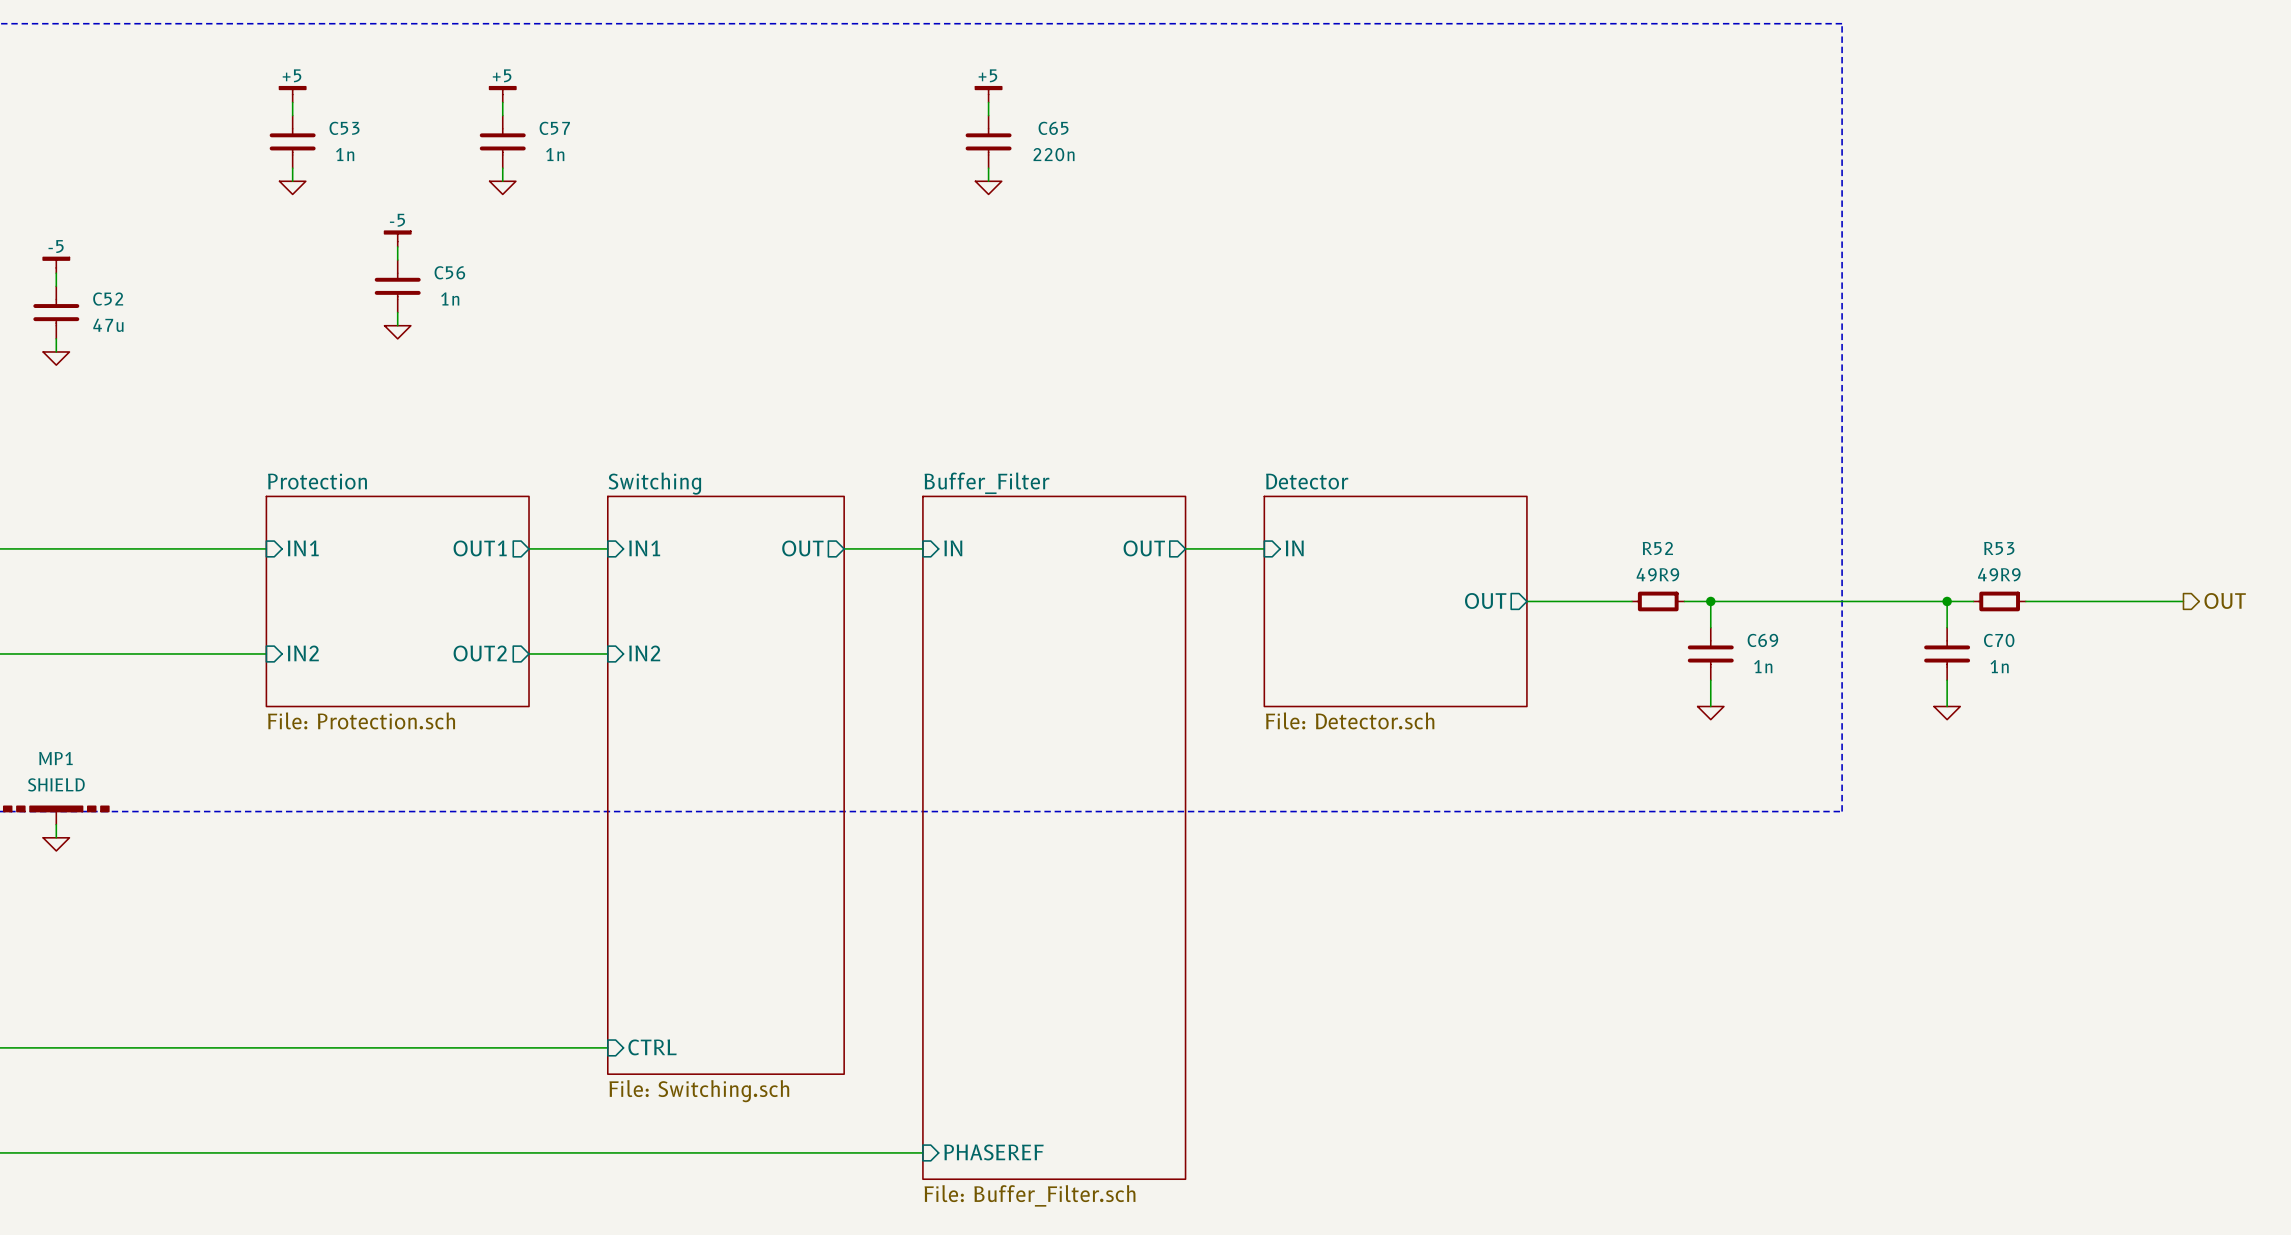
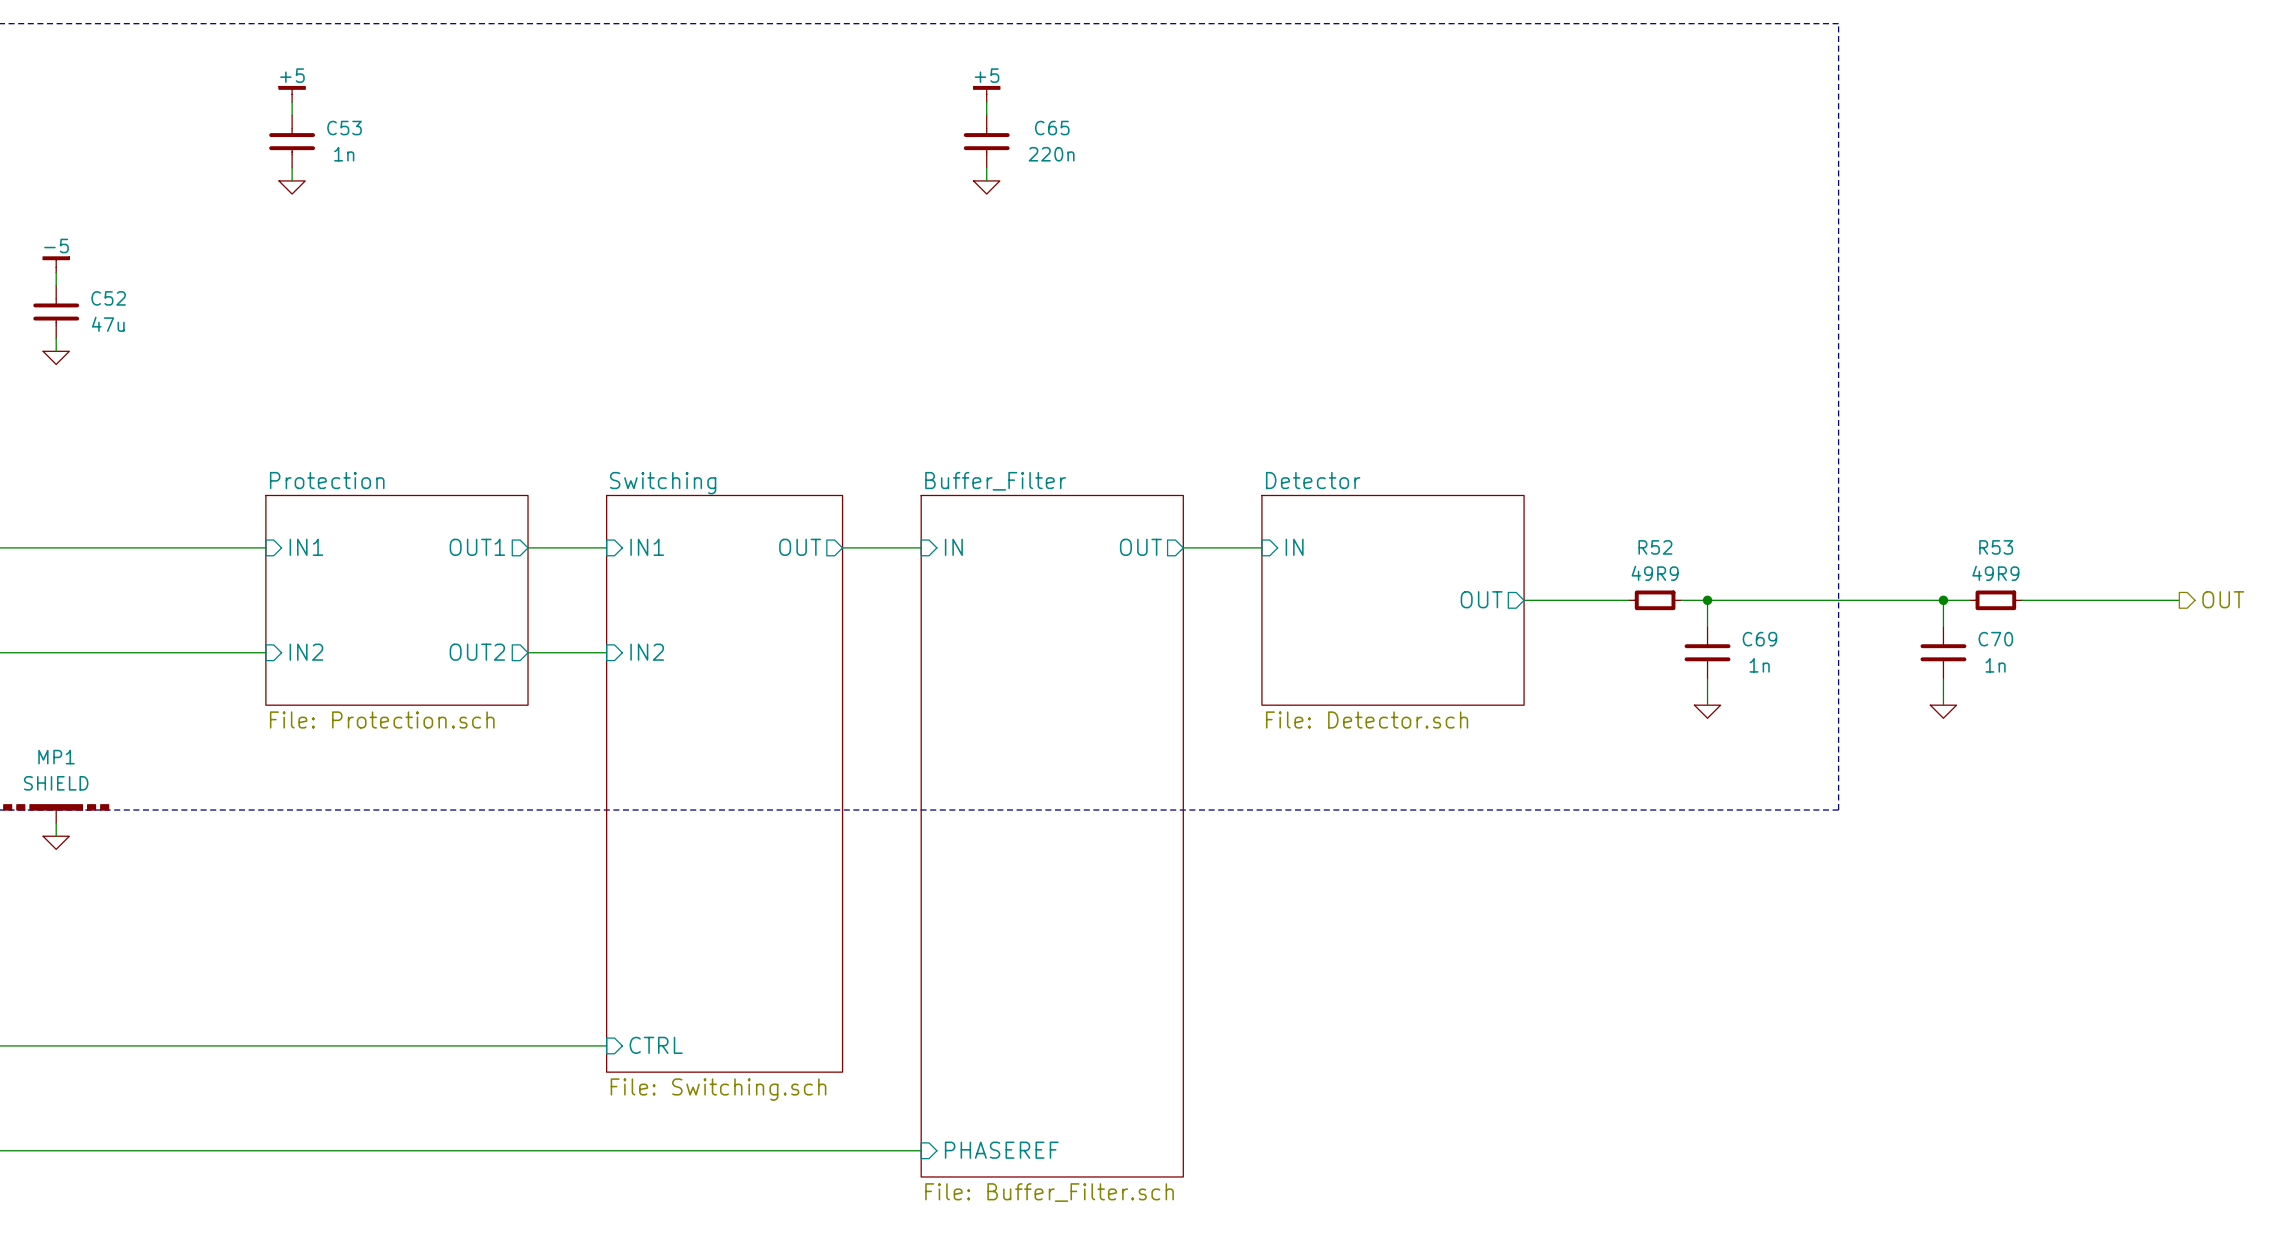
power symbol: +5 (502, 94) -> none
wire: (502, 102) (502, 115) -> none
C57: 1n (502, 141) -> none
wire: (502, 168) (502, 181) -> none
power symbol: (502, 187) -> none
power symbol: -5 (397, 239) -> none
wire: (397, 246) (397, 260) -> none
C56: 1n (397, 286) -> none
wire: (397, 312) (397, 325) -> none
power symbol: (397, 332) -> none

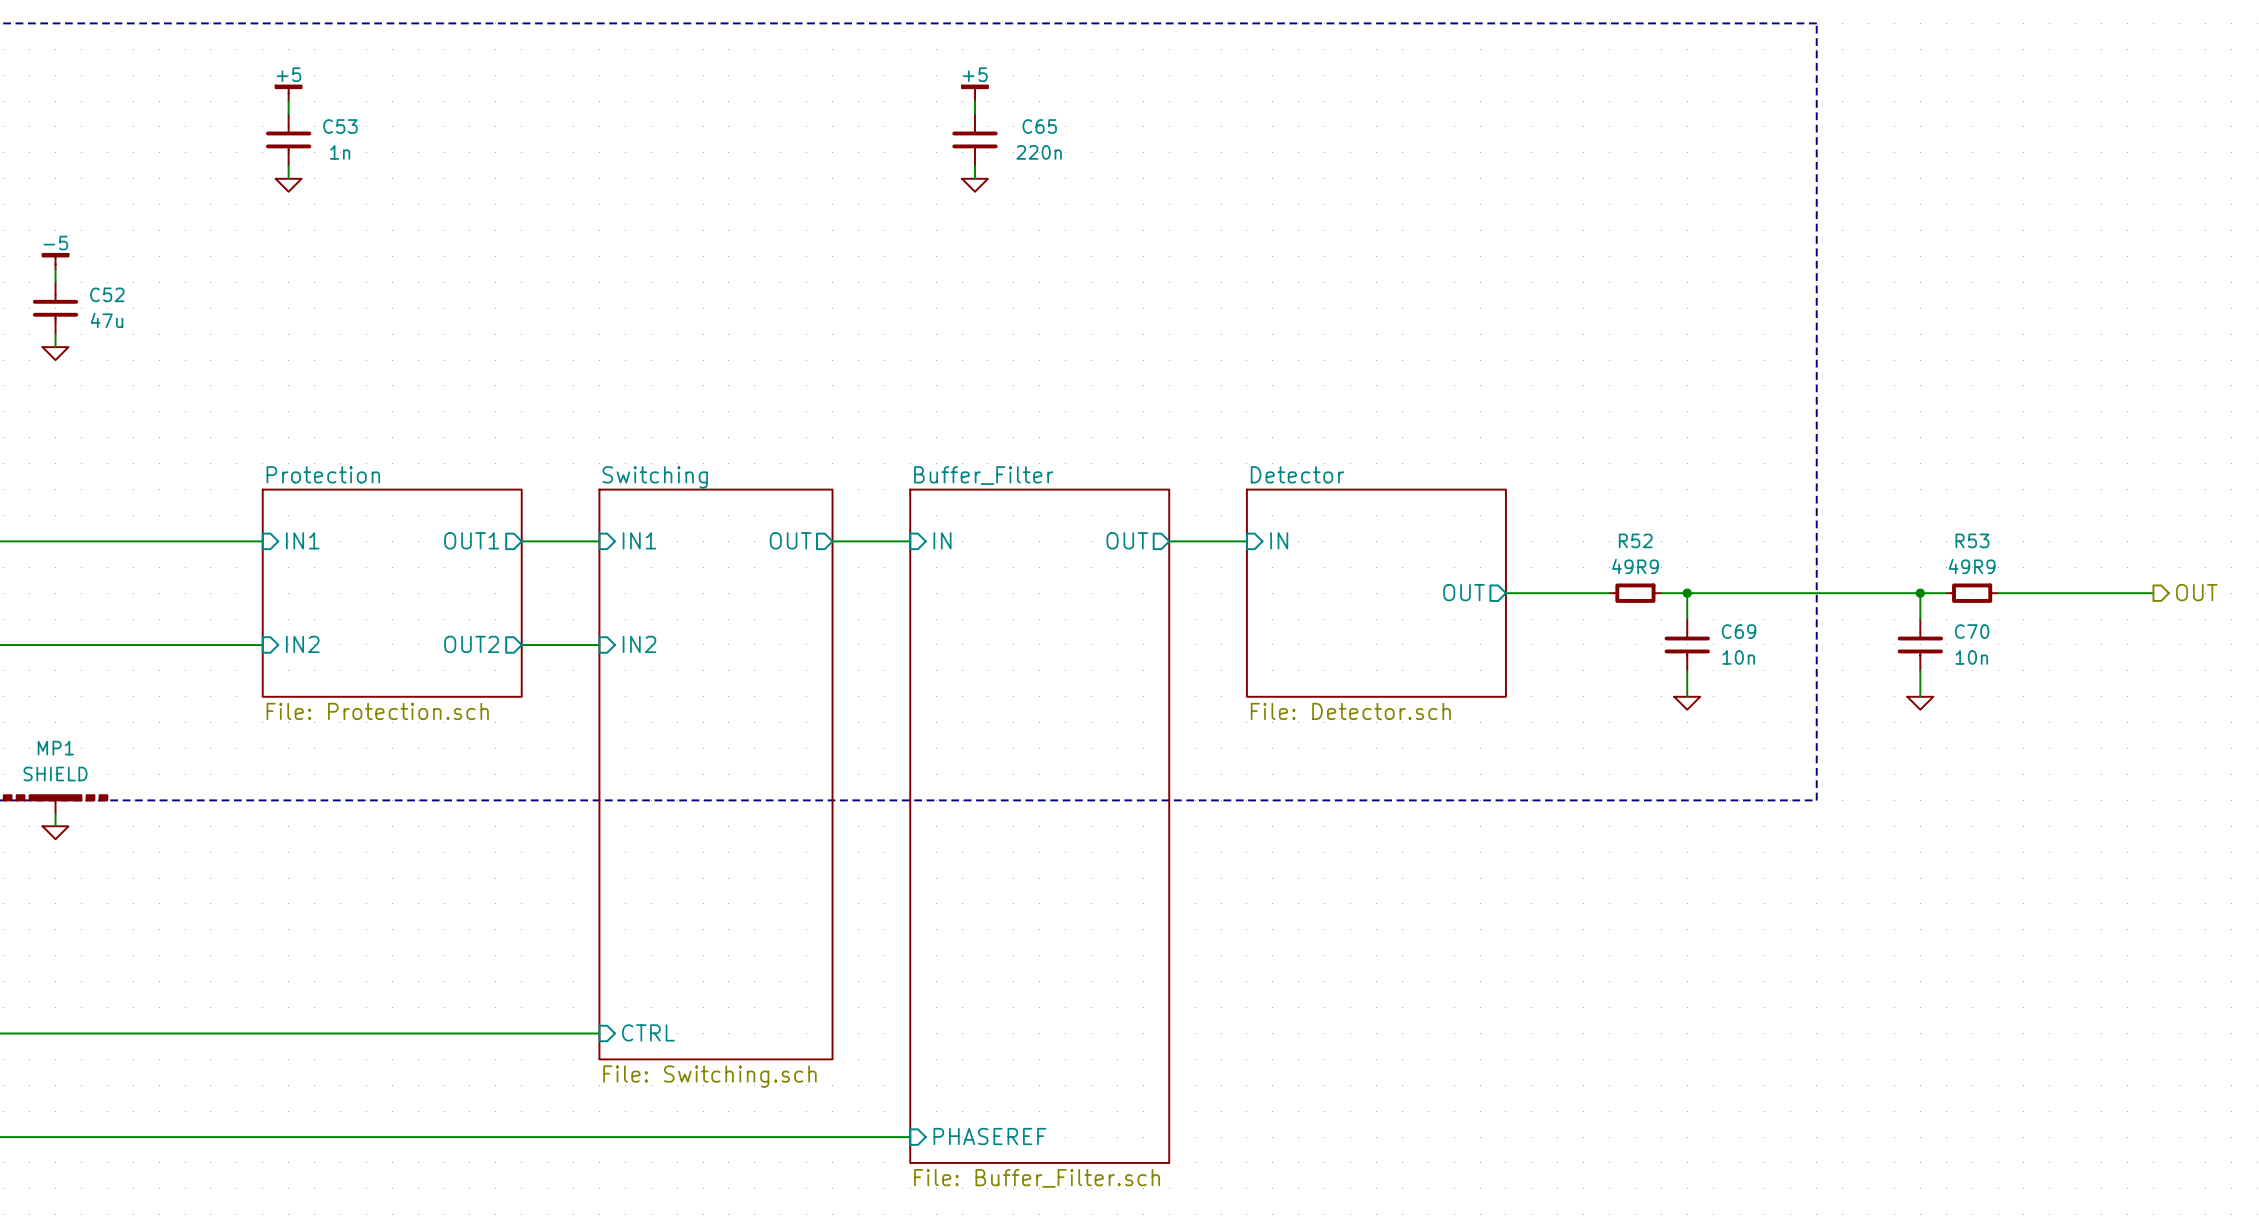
C69 value: 1n (1759, 665) -> 10n (1738, 657)
C70 value: 1n (1995, 665) -> 10n (1971, 657)

